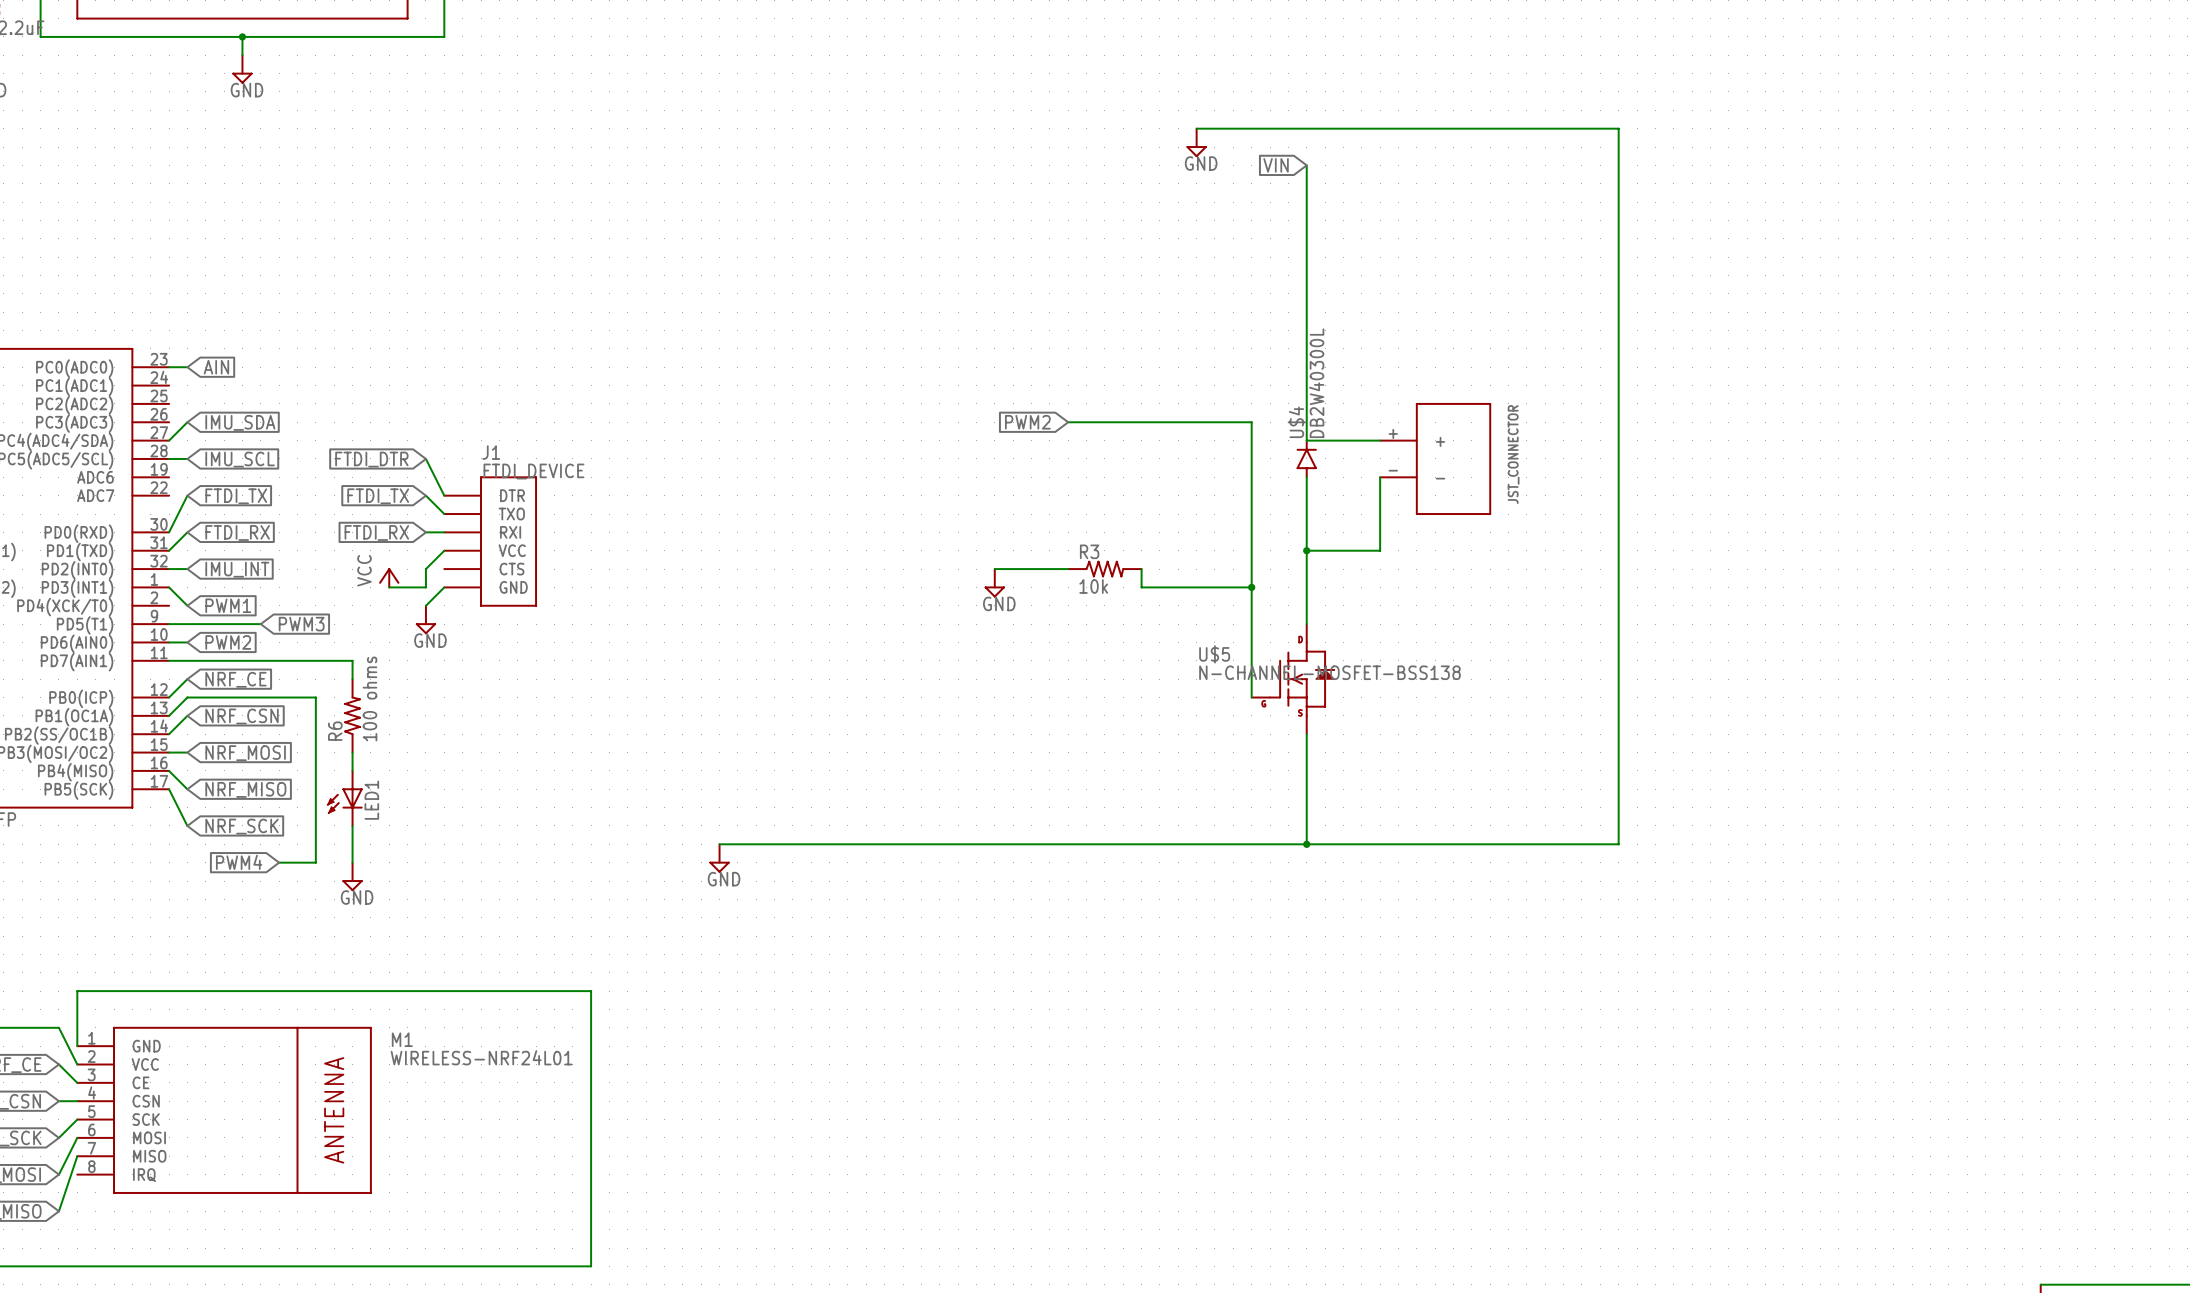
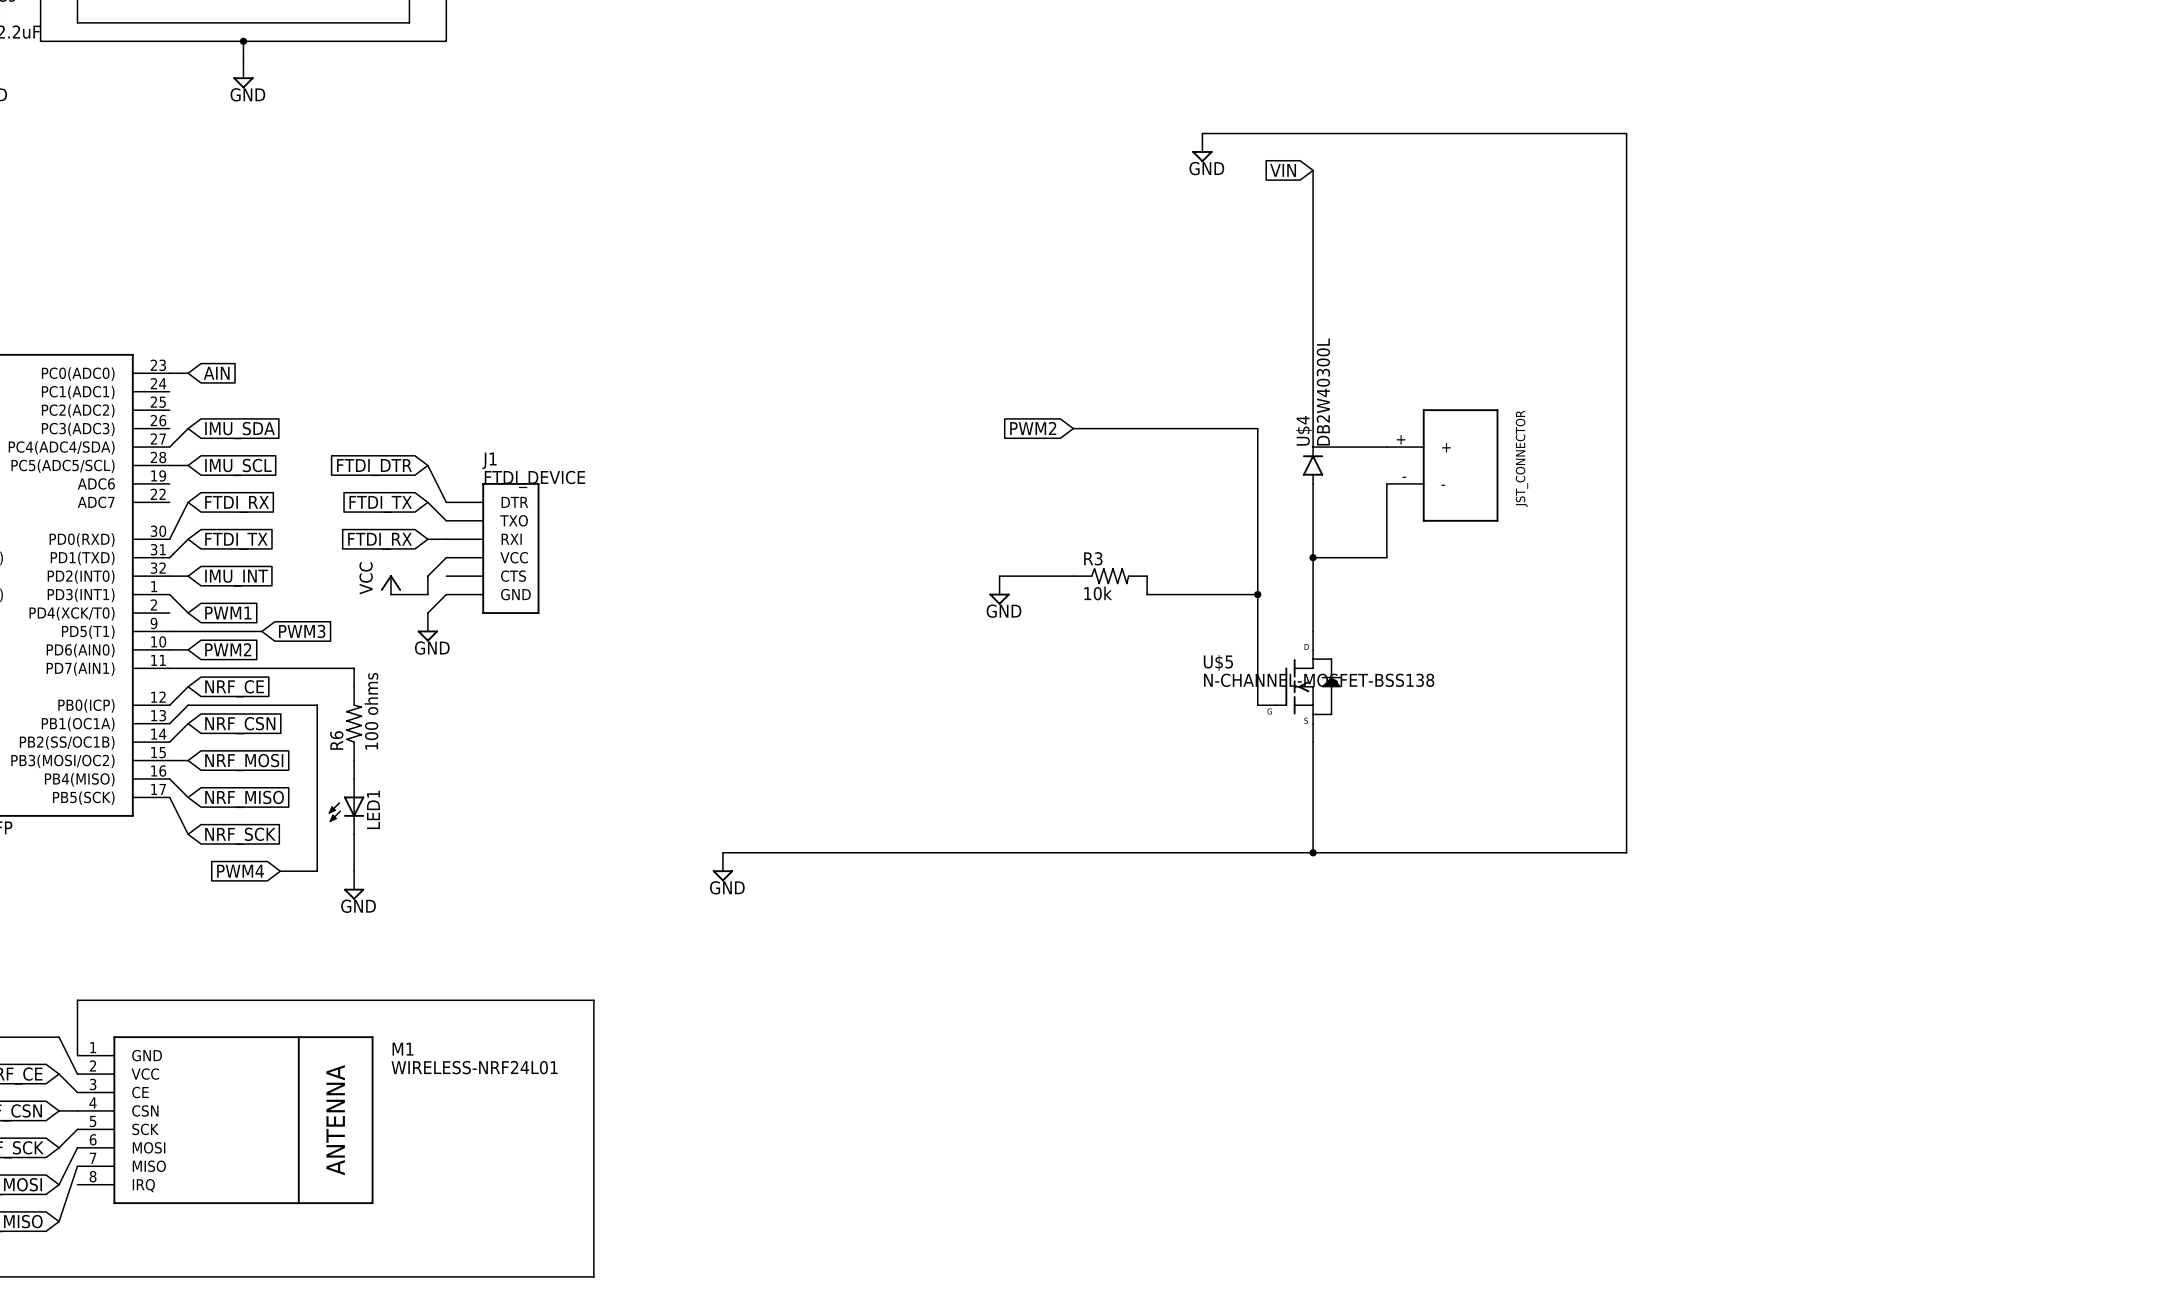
global label: FTDI_TX (236, 496) -> FTDI_RX (237, 504)
global label: FTDI_RX (237, 532) -> FTDI_TX (236, 541)

